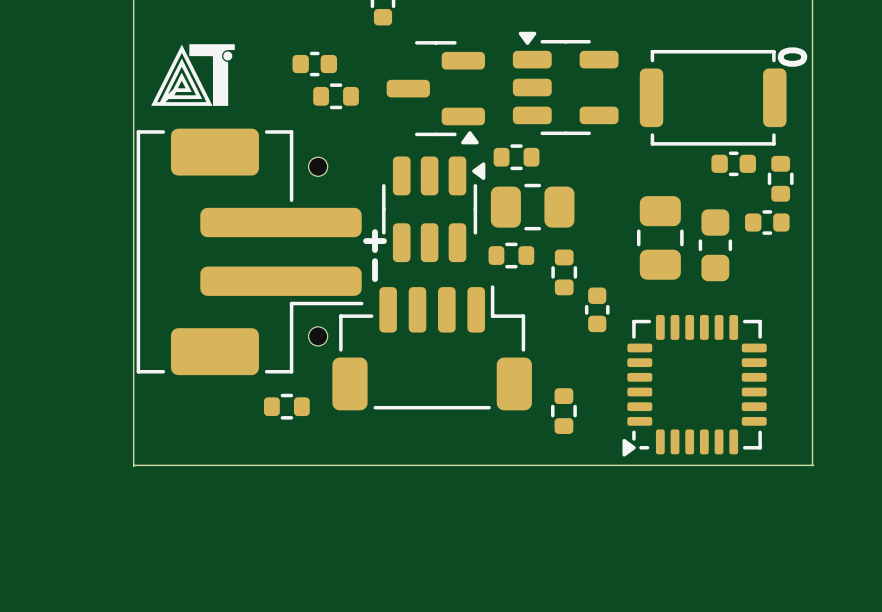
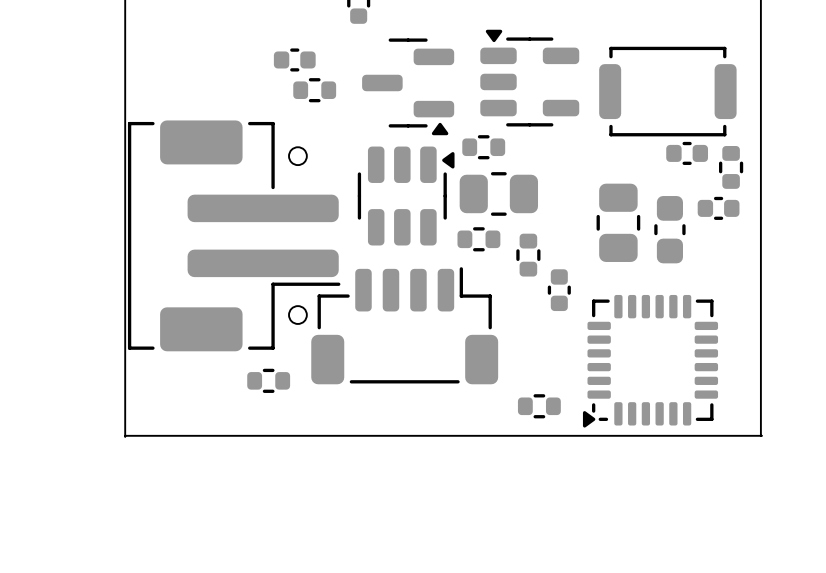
drawing: [151, 44, 235, 106] -> none
text: 0 (792, 57) -> none
text: +- (375, 255) -> none
part rotation: 0° (563, 411) -> 90° clockwise (539, 406)

